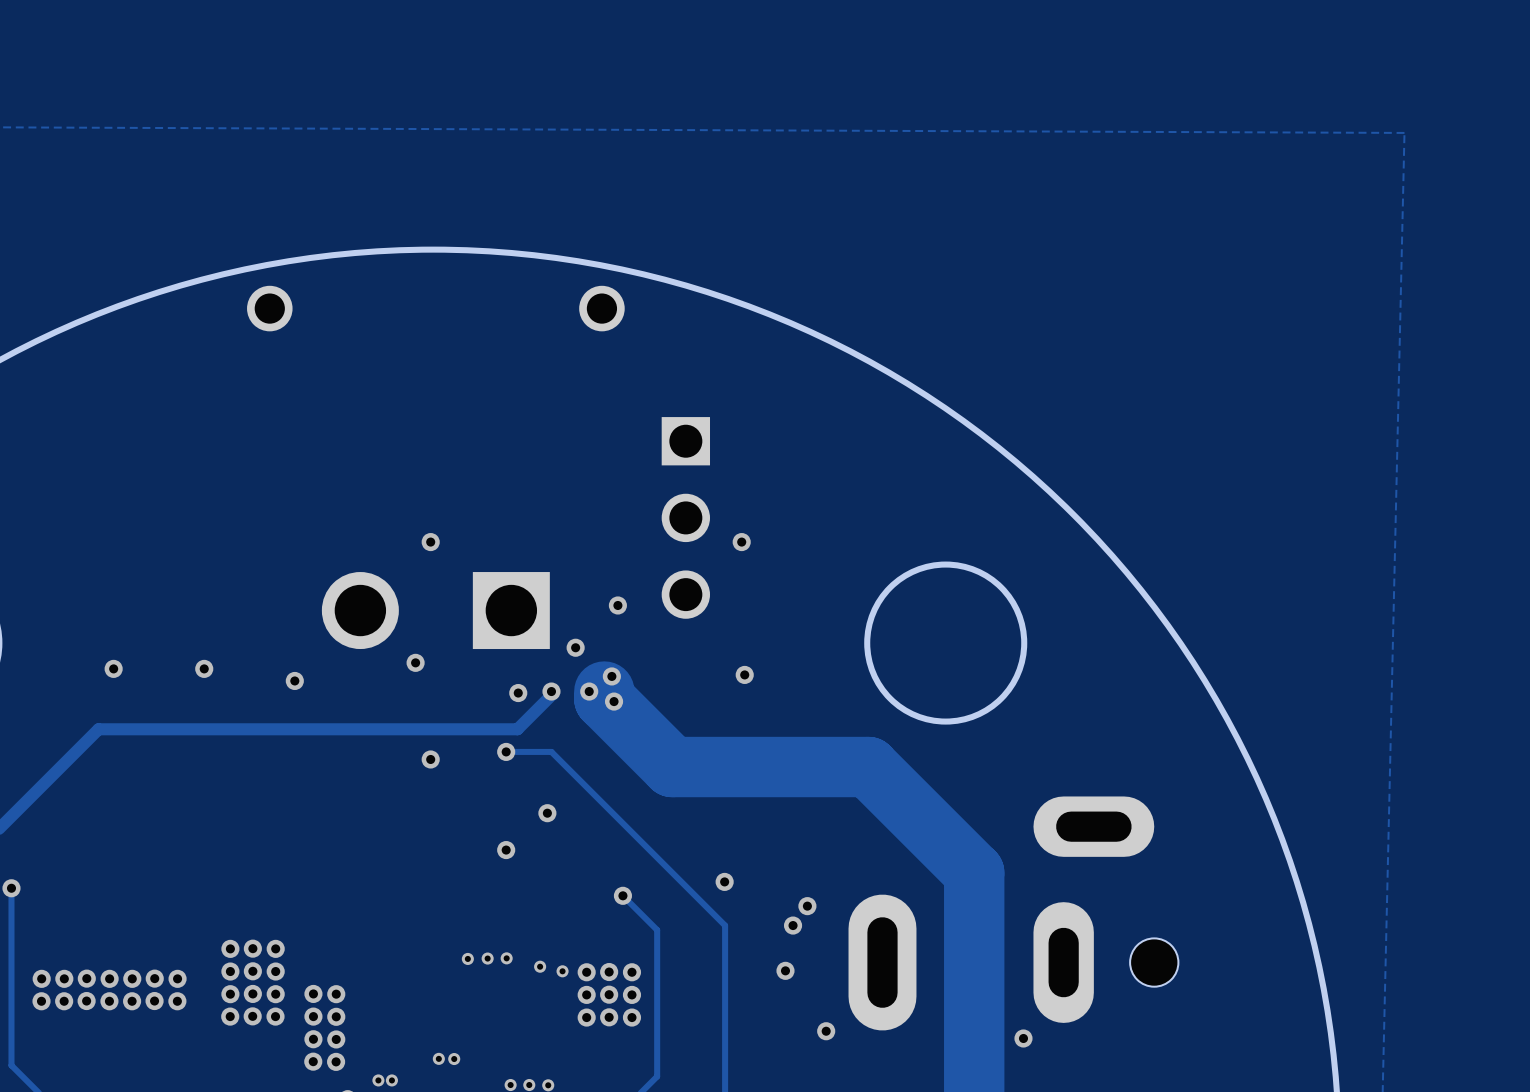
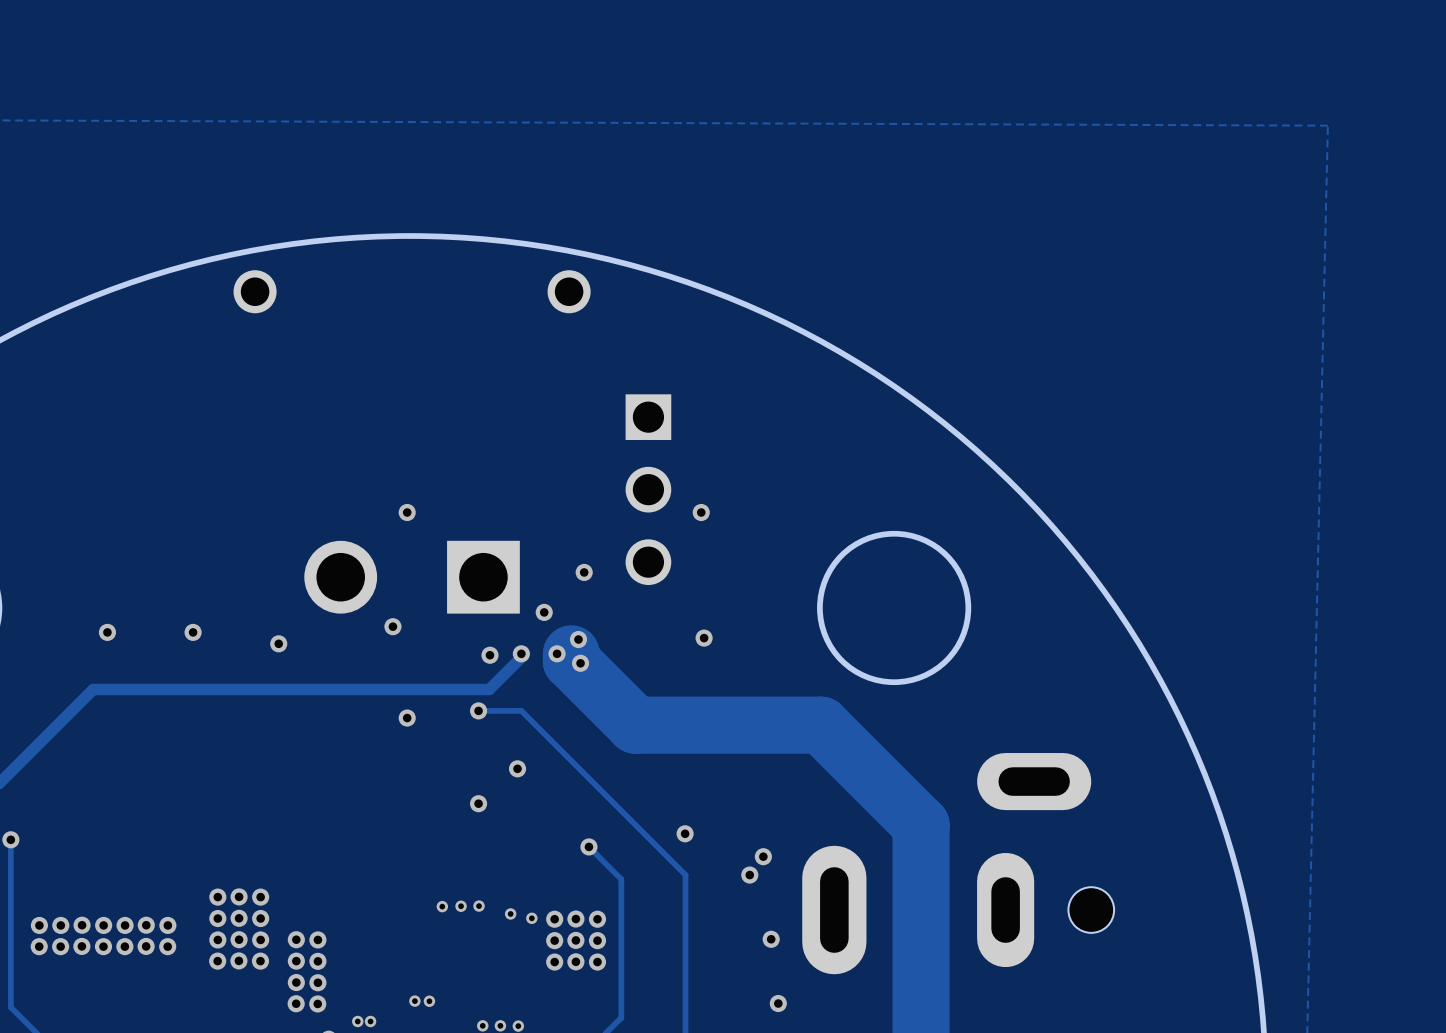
via: (785, 970) -> none
via: none -> (771, 939)
via: (826, 1031) -> none
via: (1023, 1038) -> none
via: none -> (778, 1003)

